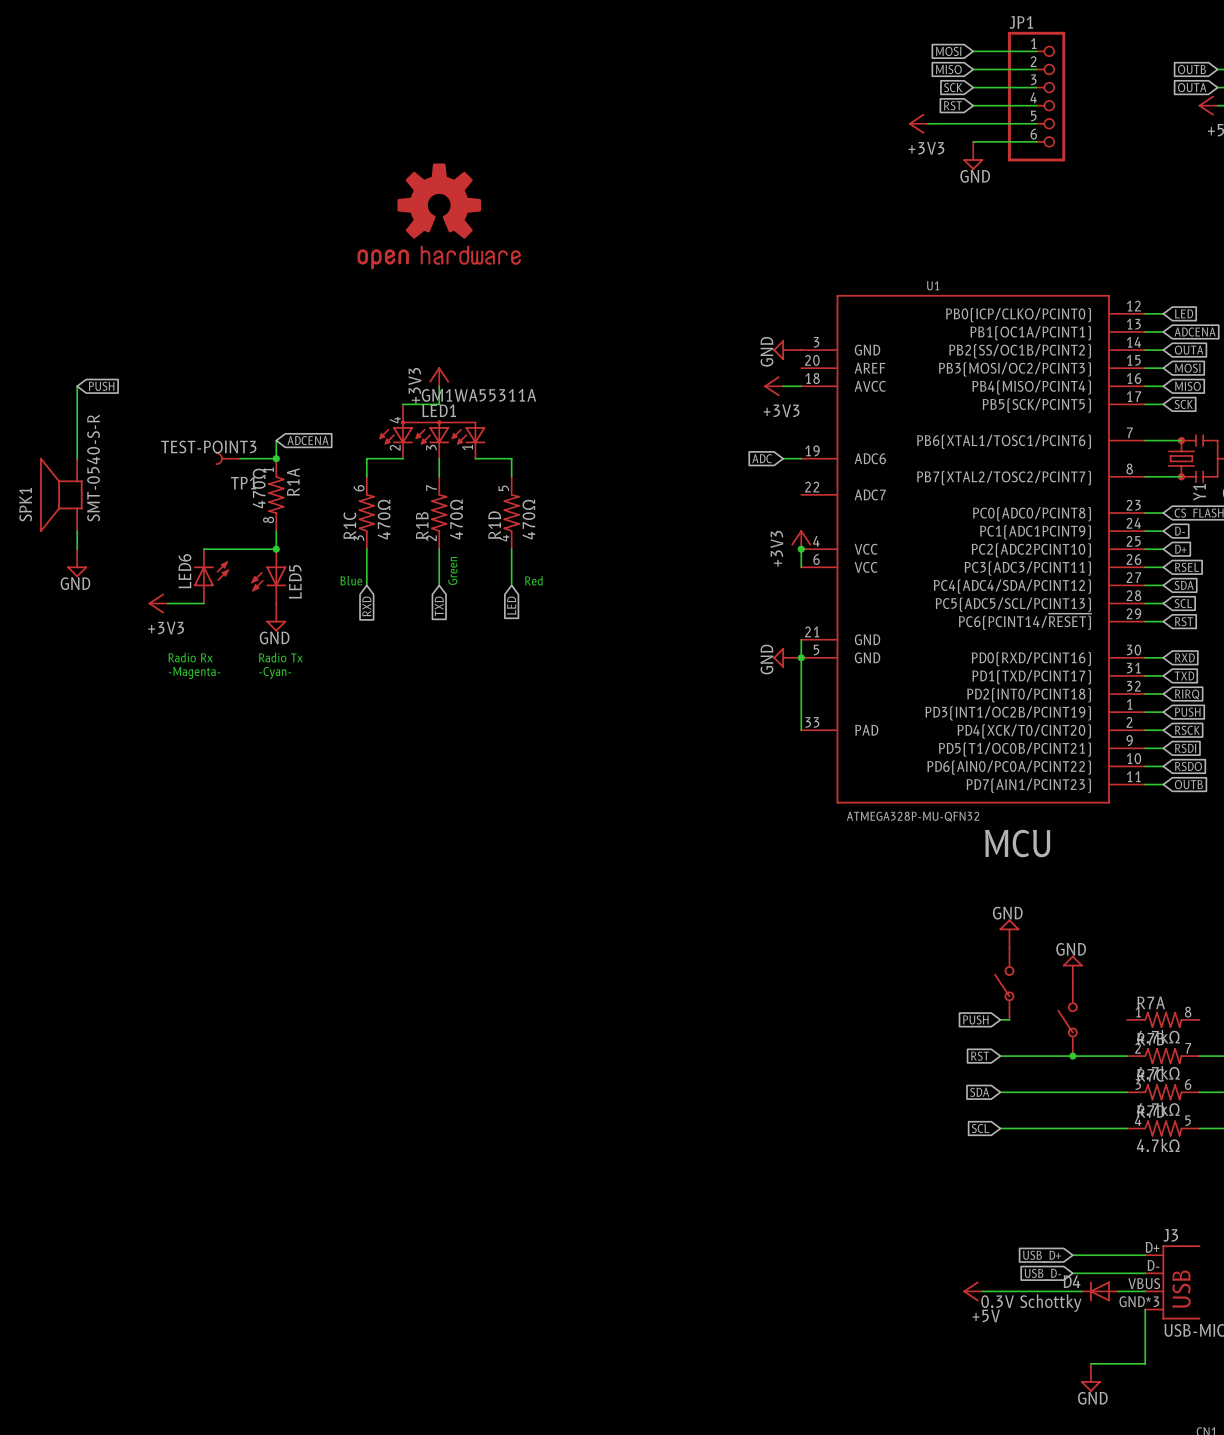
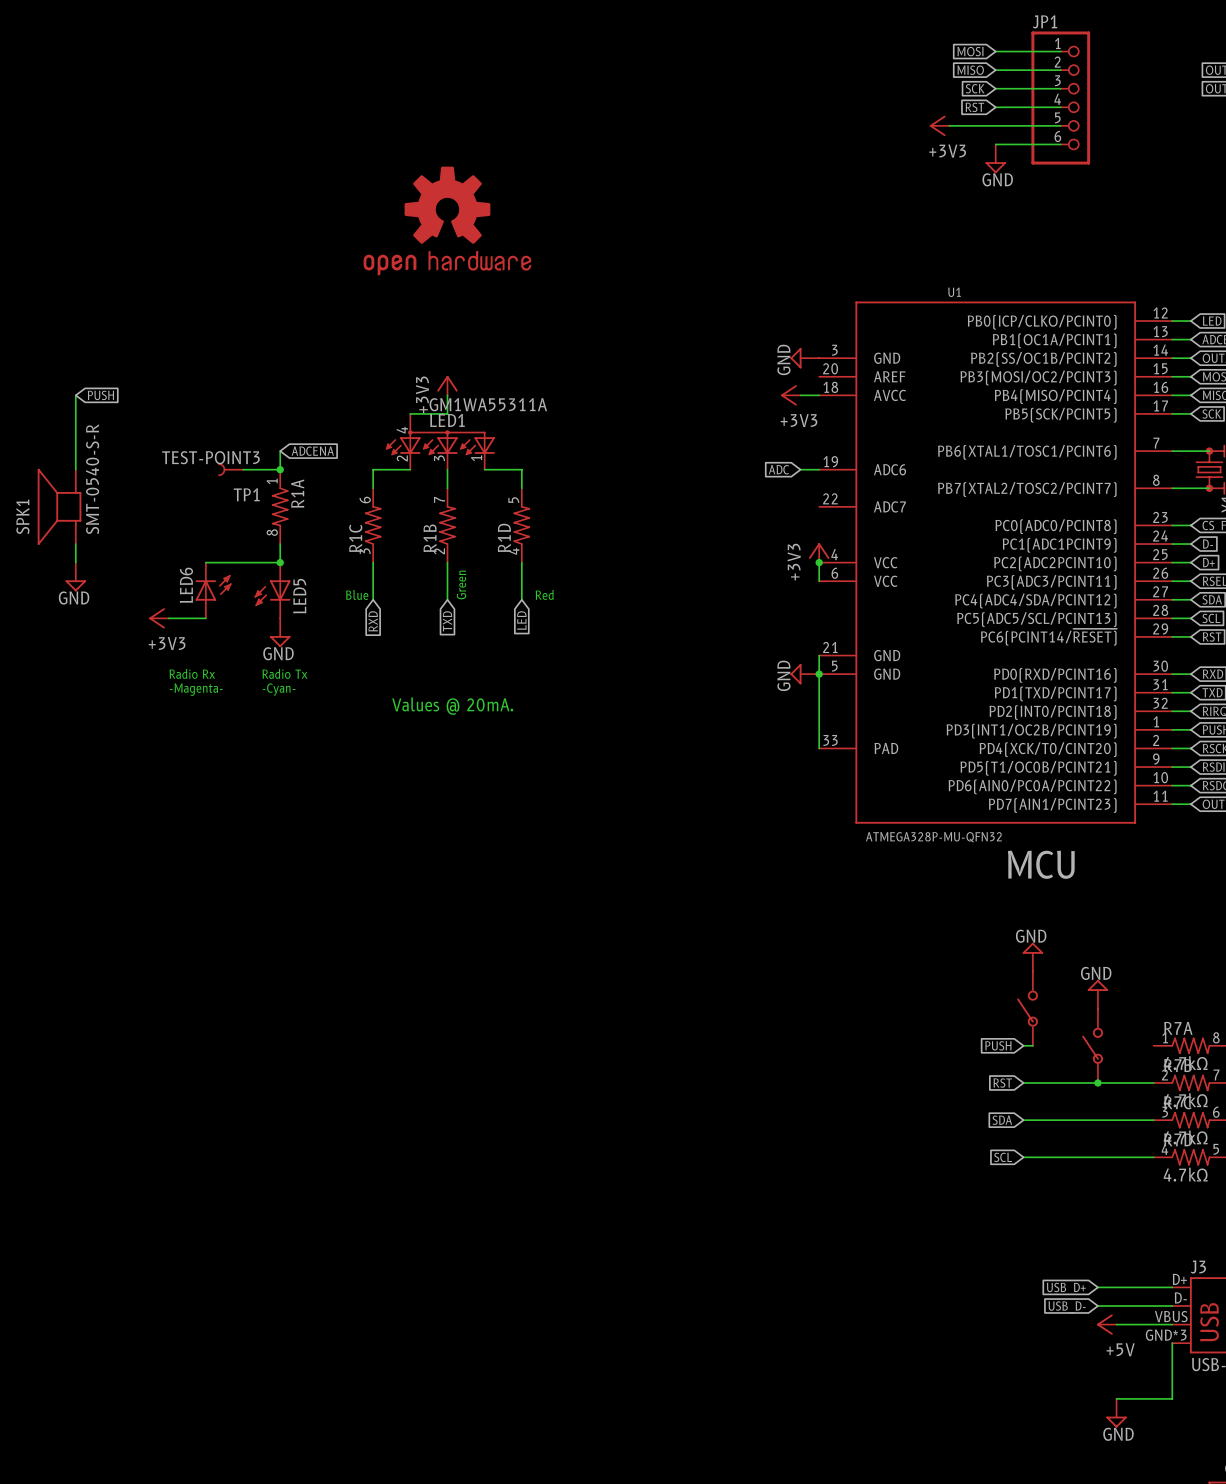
R1A value: 470Ω (259, 488) -> none
R1C value: 470Ω (384, 519) -> none
R1B value: 470Ω (456, 519) -> none
R1D value: 470Ω (528, 519) -> none
text: none -> Values @ 20mA. (452, 706)
power symbol position: +5V (972, 1291) -> +5V (1106, 1324)
wire: (982, 1291) (1081, 1291) -> none
D4: 0.3V Schottky (1099, 1291) -> none

